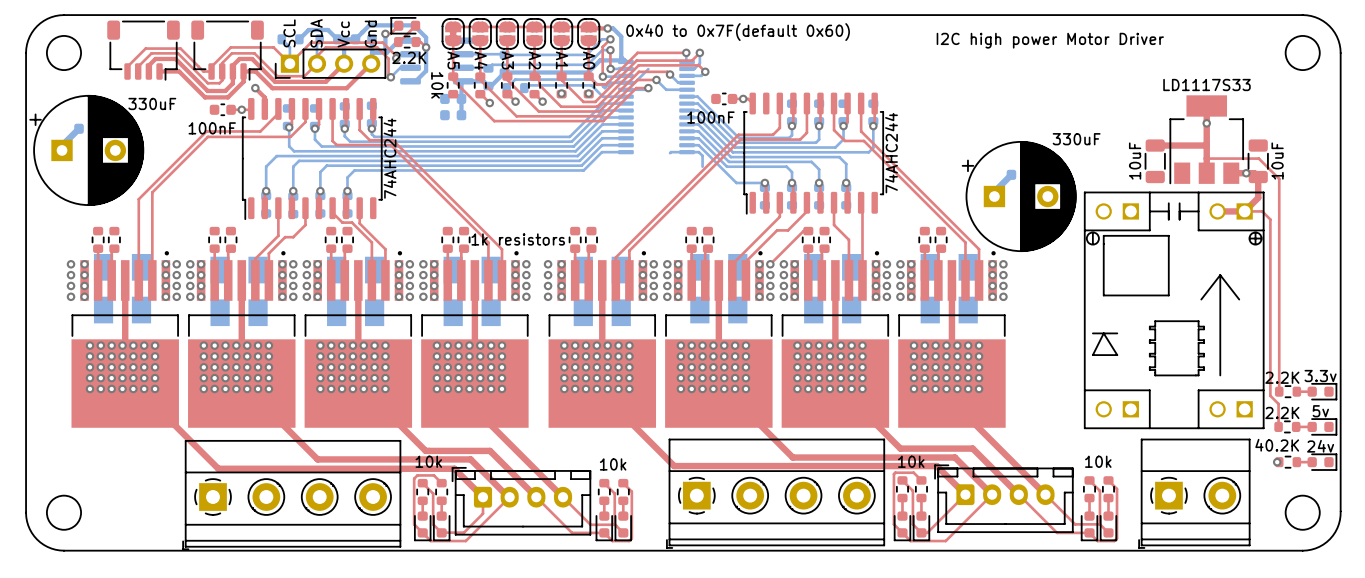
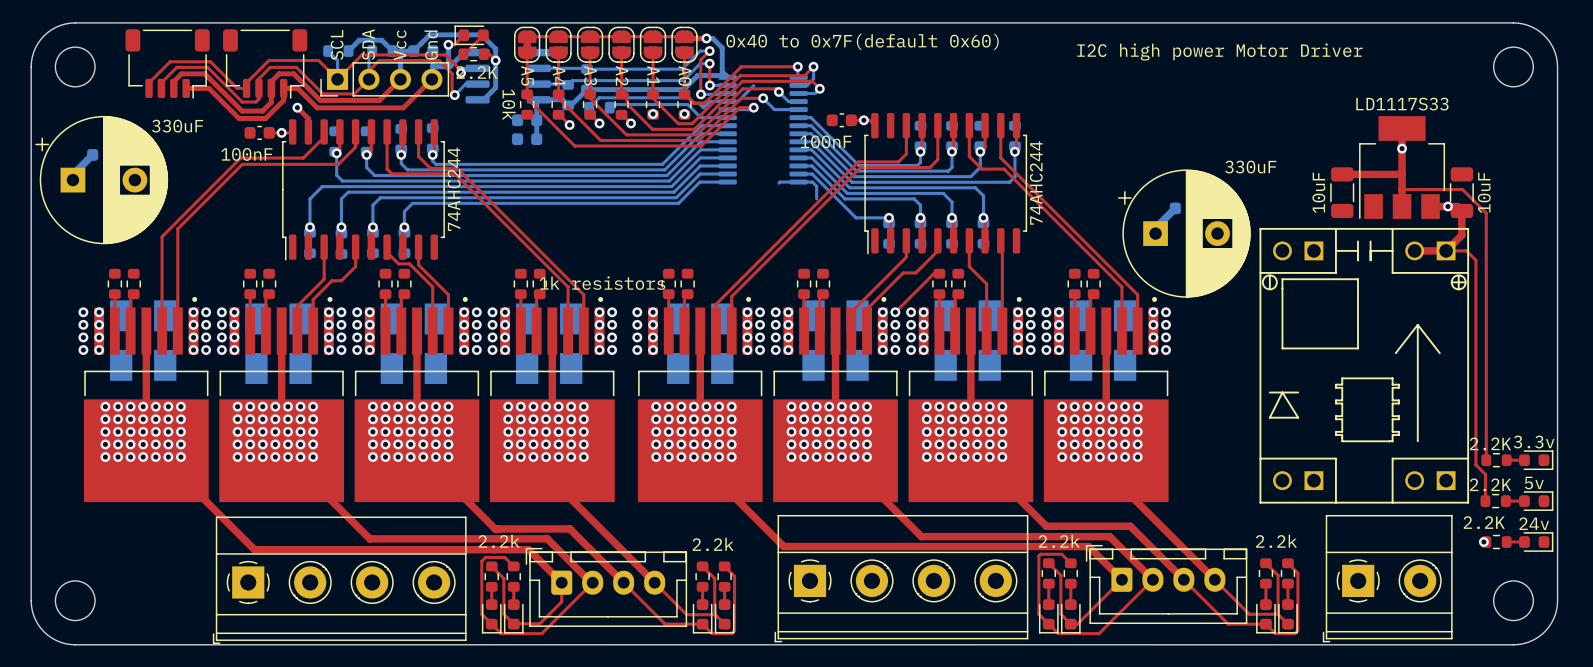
part value: 40.2K (1277, 445) -> 2.2K (1484, 522)
text: 10k (428, 461) -> 2.2k (499, 541)
text: 10k (911, 461) -> 2.2k (1059, 541)
text: 10k (1098, 461) -> 2.2k (1276, 541)
text: 10k (613, 464) -> 2.2k (713, 544)

